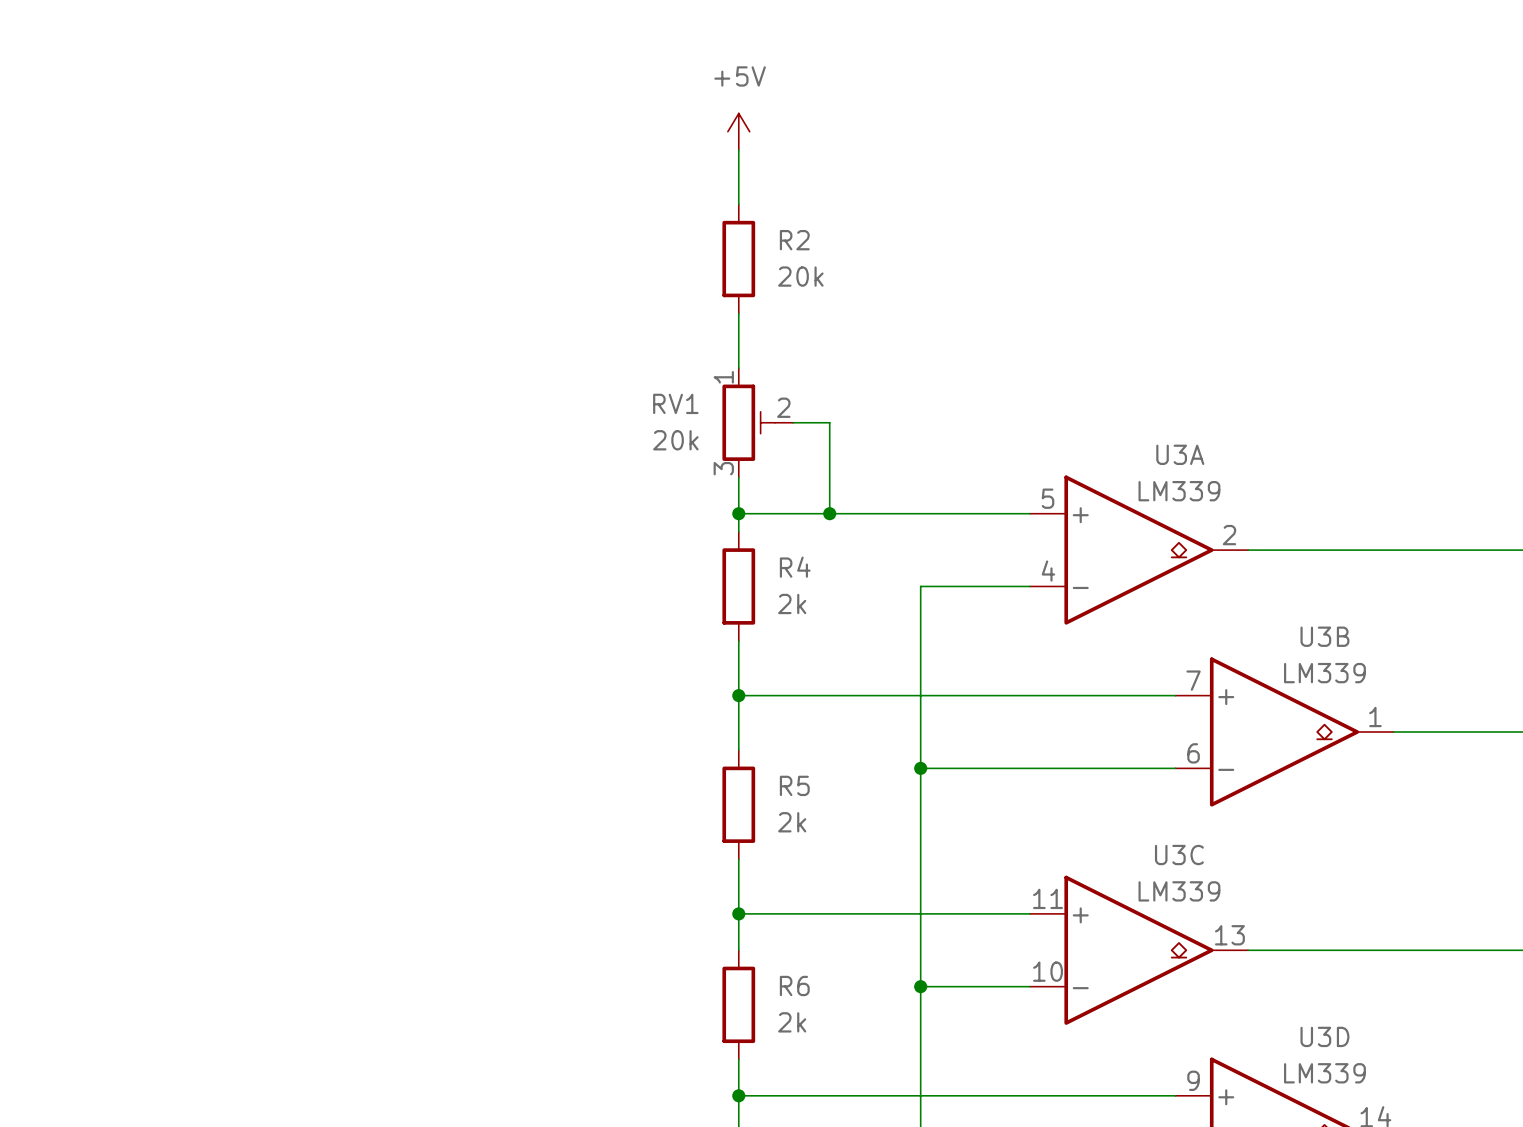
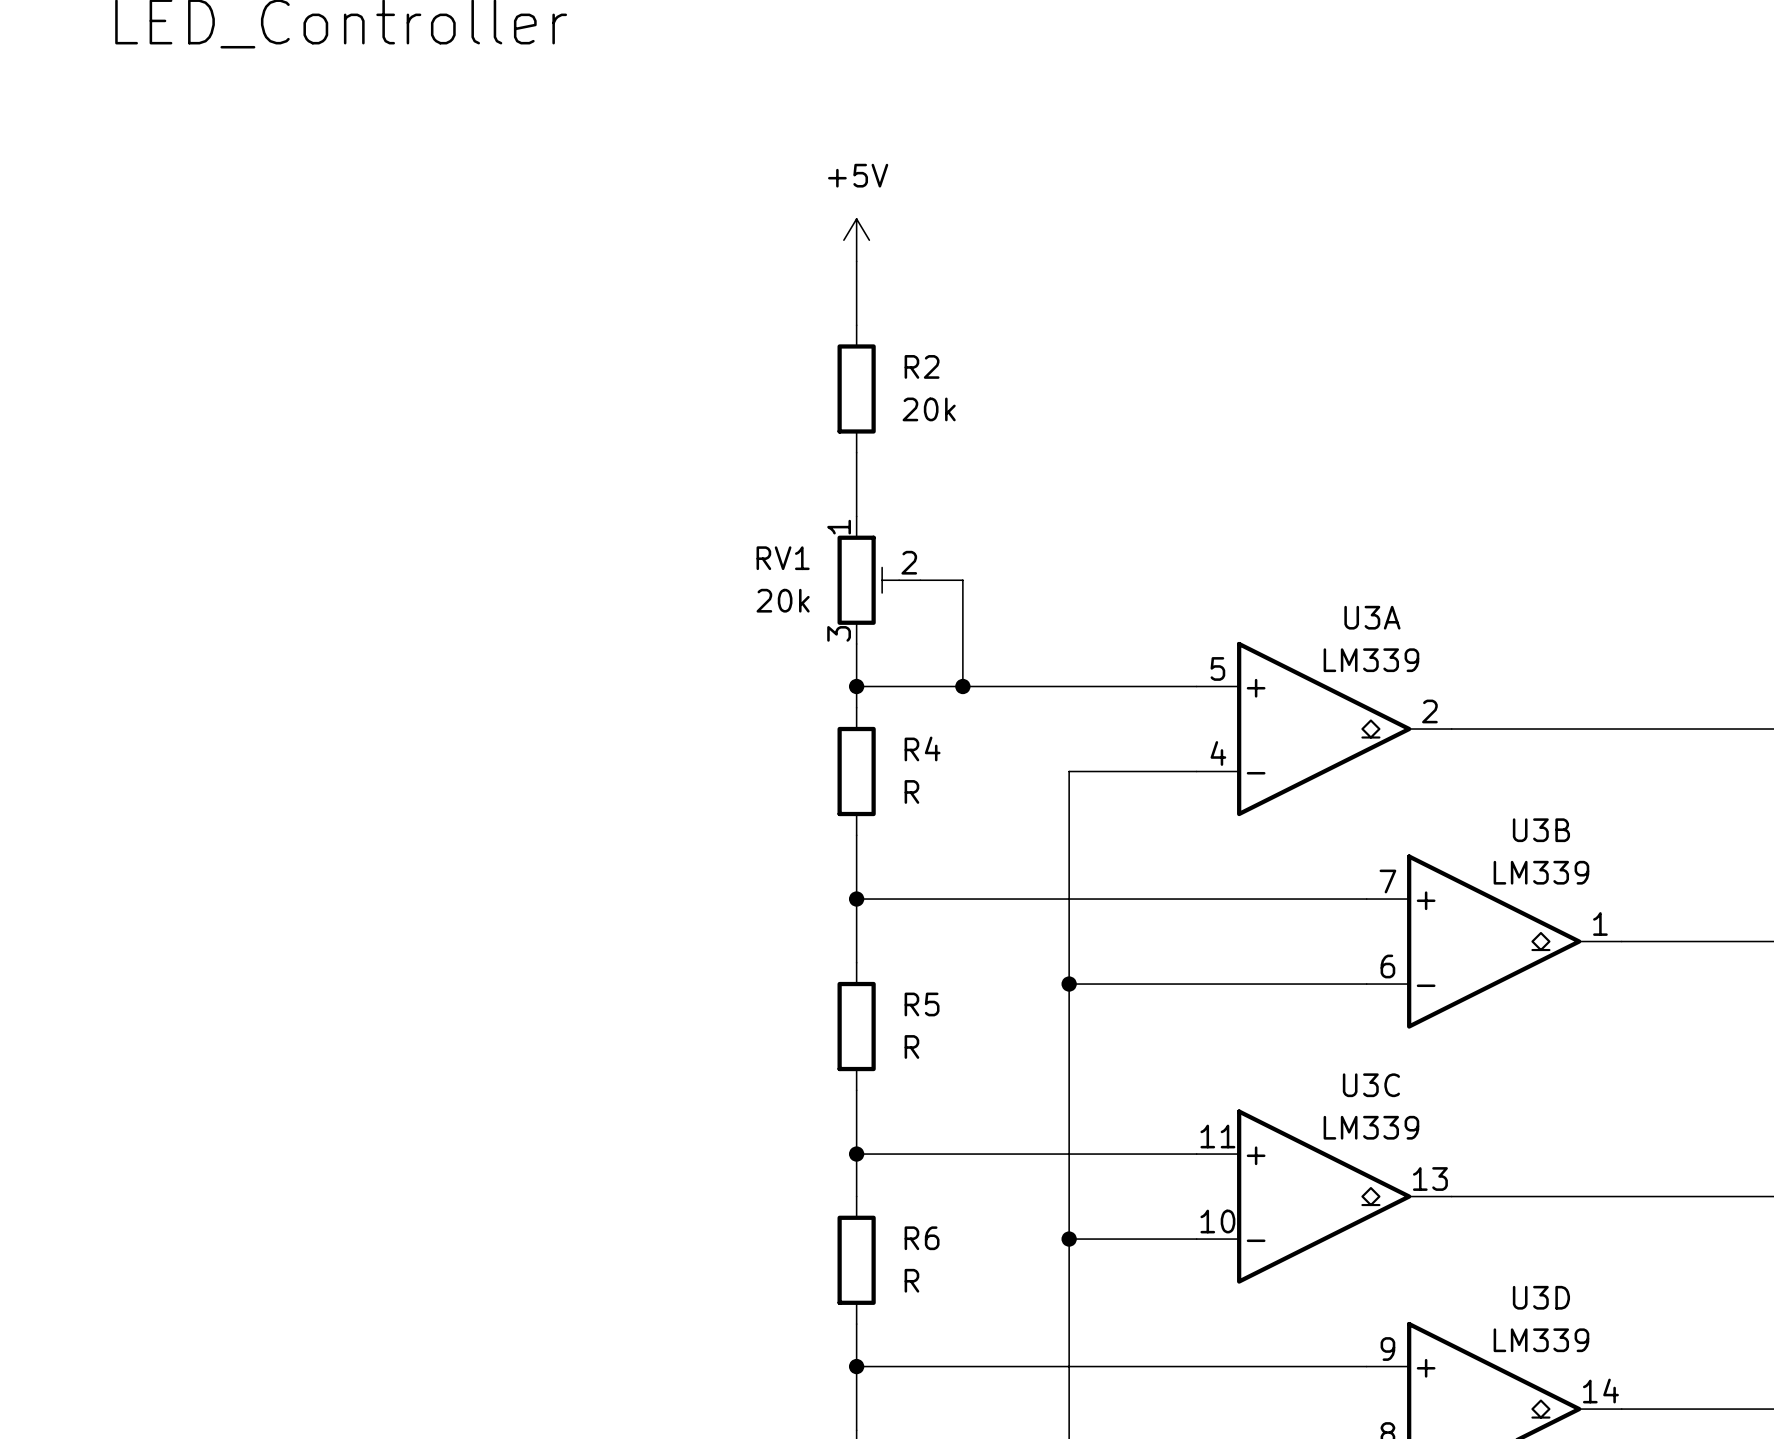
R4 value: 2k (792, 603) -> R (911, 791)
R5 value: 2k (792, 822) -> R (911, 1046)
R6 value: 2k (792, 1022) -> R (911, 1280)

